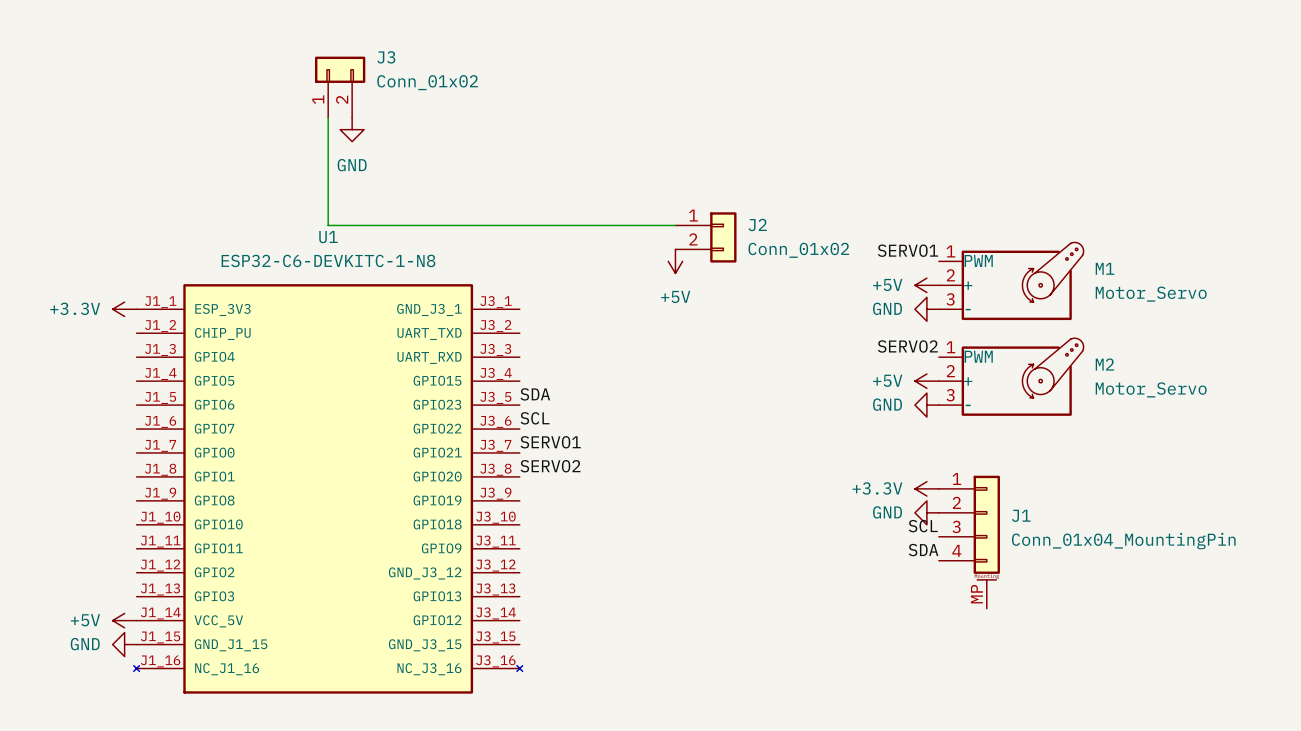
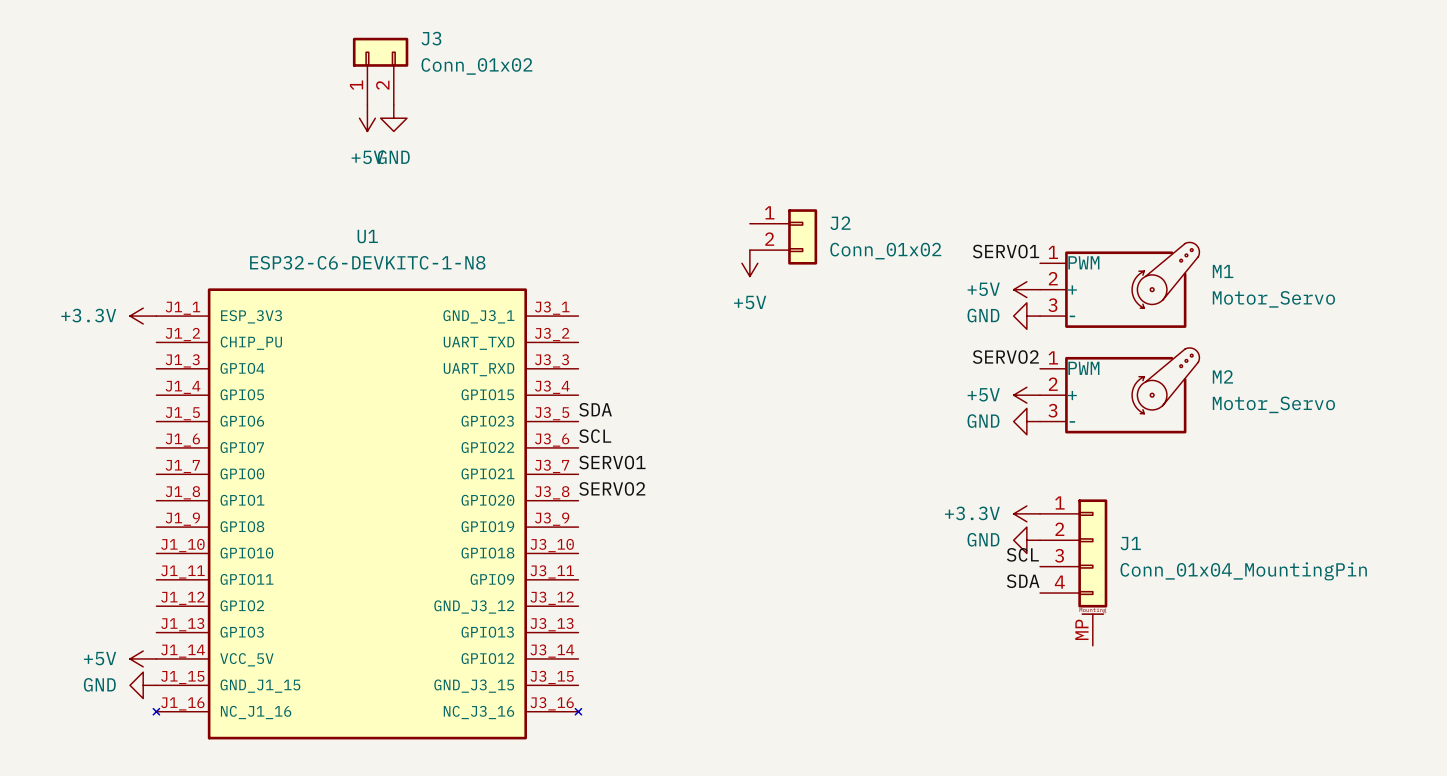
wire: (328, 117) (328, 225) (675, 225) -> none
power symbol: none -> +5V (367, 118)

